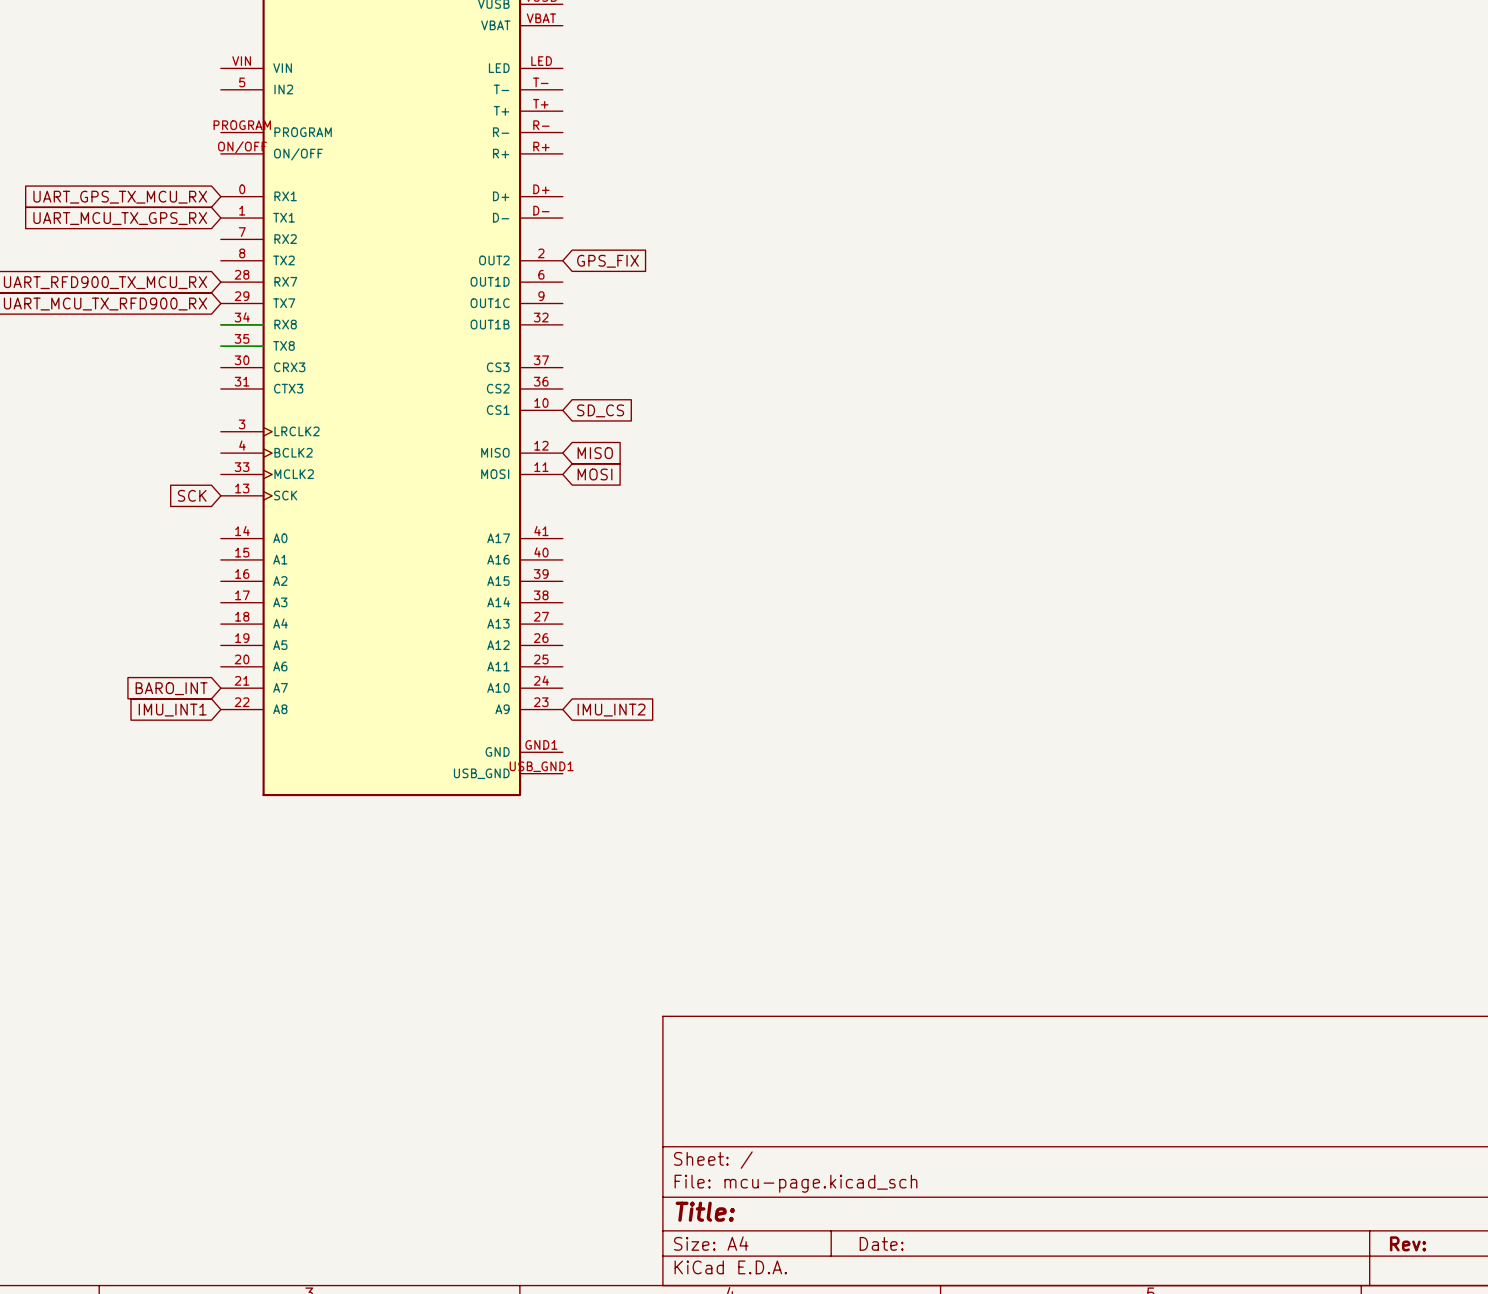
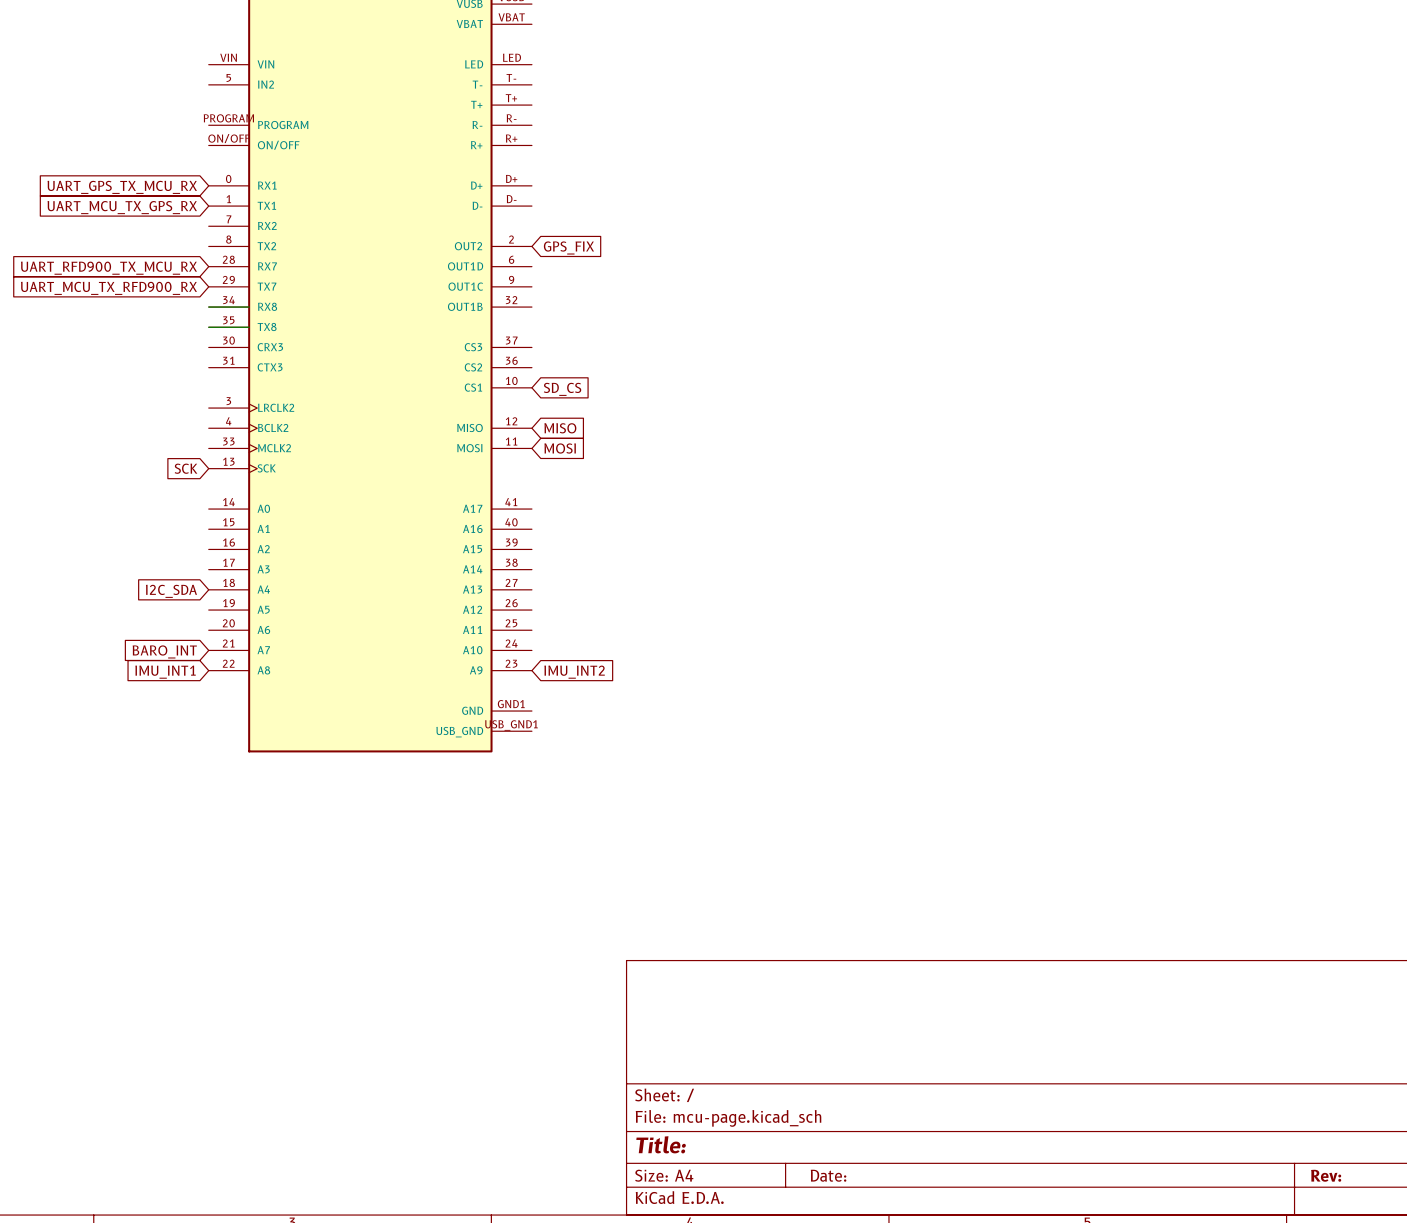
global label: none -> I2C_SDA (171, 591)

